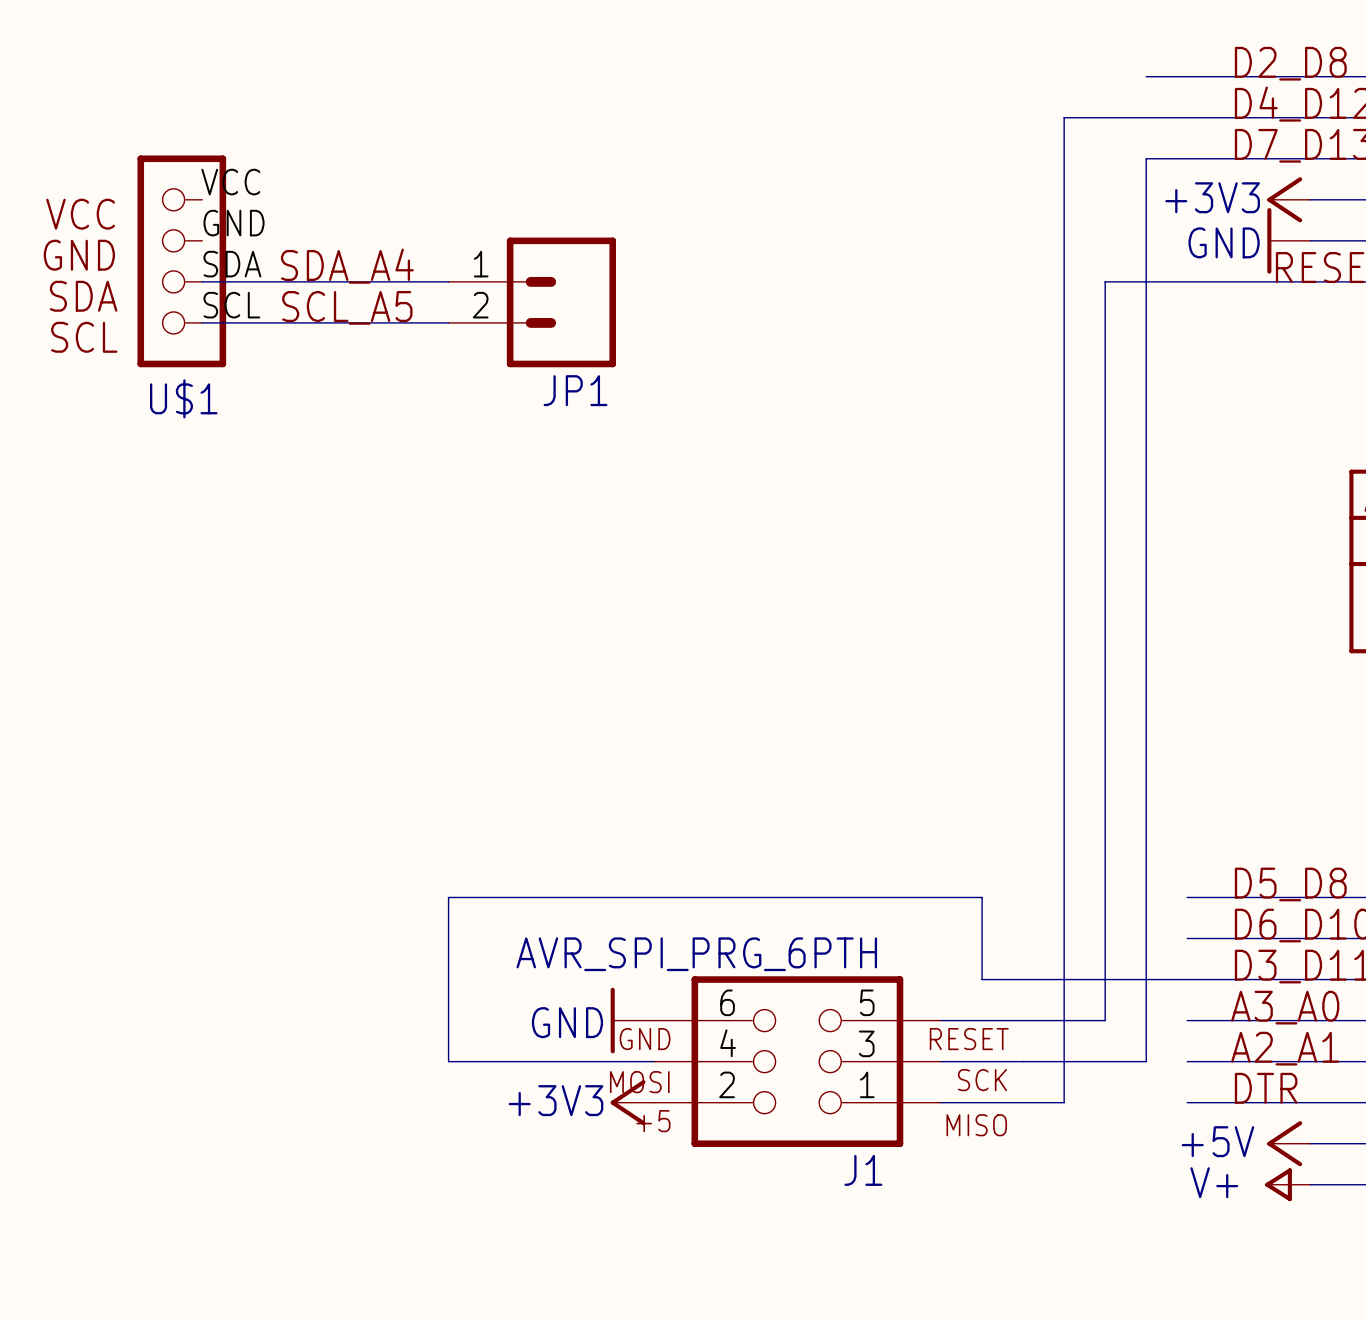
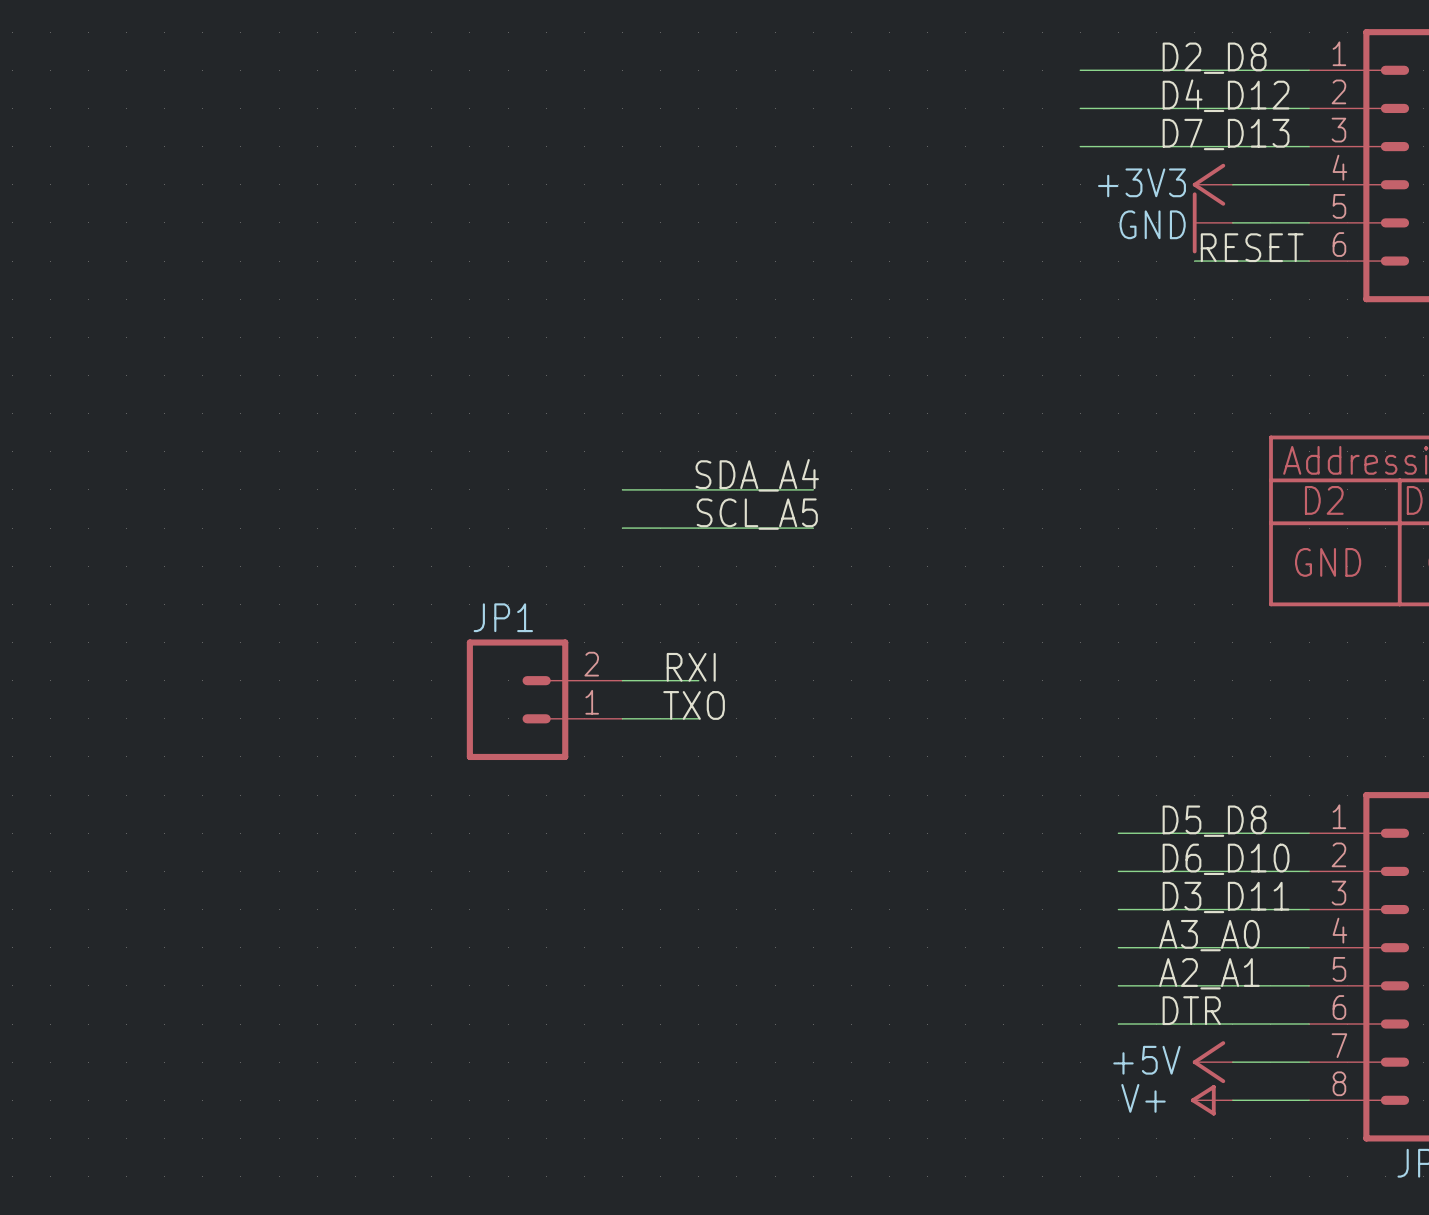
wire: (1146, 117) (1064, 117) (1064, 1102) (941, 1102) -> none
wire: (1146, 158) (1146, 1061) (941, 1061) -> none
U$1: (181, 261) -> none
label: SDA_A4 (347, 266) -> none
wire: (202, 281) (448, 281) -> none
wire: (1269, 281) (1105, 281) (1105, 1020) (941, 1020) -> none
JP1 position: (532, 302) -> (544, 699)
JP1 rotation: 0° (561, 302) -> 180° (517, 699)
label: SCL_A5 (347, 307) -> none
wire: (202, 322) (448, 322) -> none
label: none -> SDA_A4 (757, 475)
wire: none -> (622, 489) (813, 489)
label: none -> SCL_A5 (757, 514)
wire: none -> (622, 528) (813, 528)
label: none -> RXI (691, 667)
wire: none -> (622, 680) (698, 680)
label: none -> TXO (694, 705)
wire: none -> (622, 718) (698, 718)
wire: (1187, 979) (982, 979) (982, 897) (448, 897) (448, 1061) (653, 1061) -> none
power symbol: GND (632, 1020) -> none
J1: AVR_SPI_PRG_6PTH (797, 1061) -> none
power symbol: +3V3 (632, 1102) -> none

